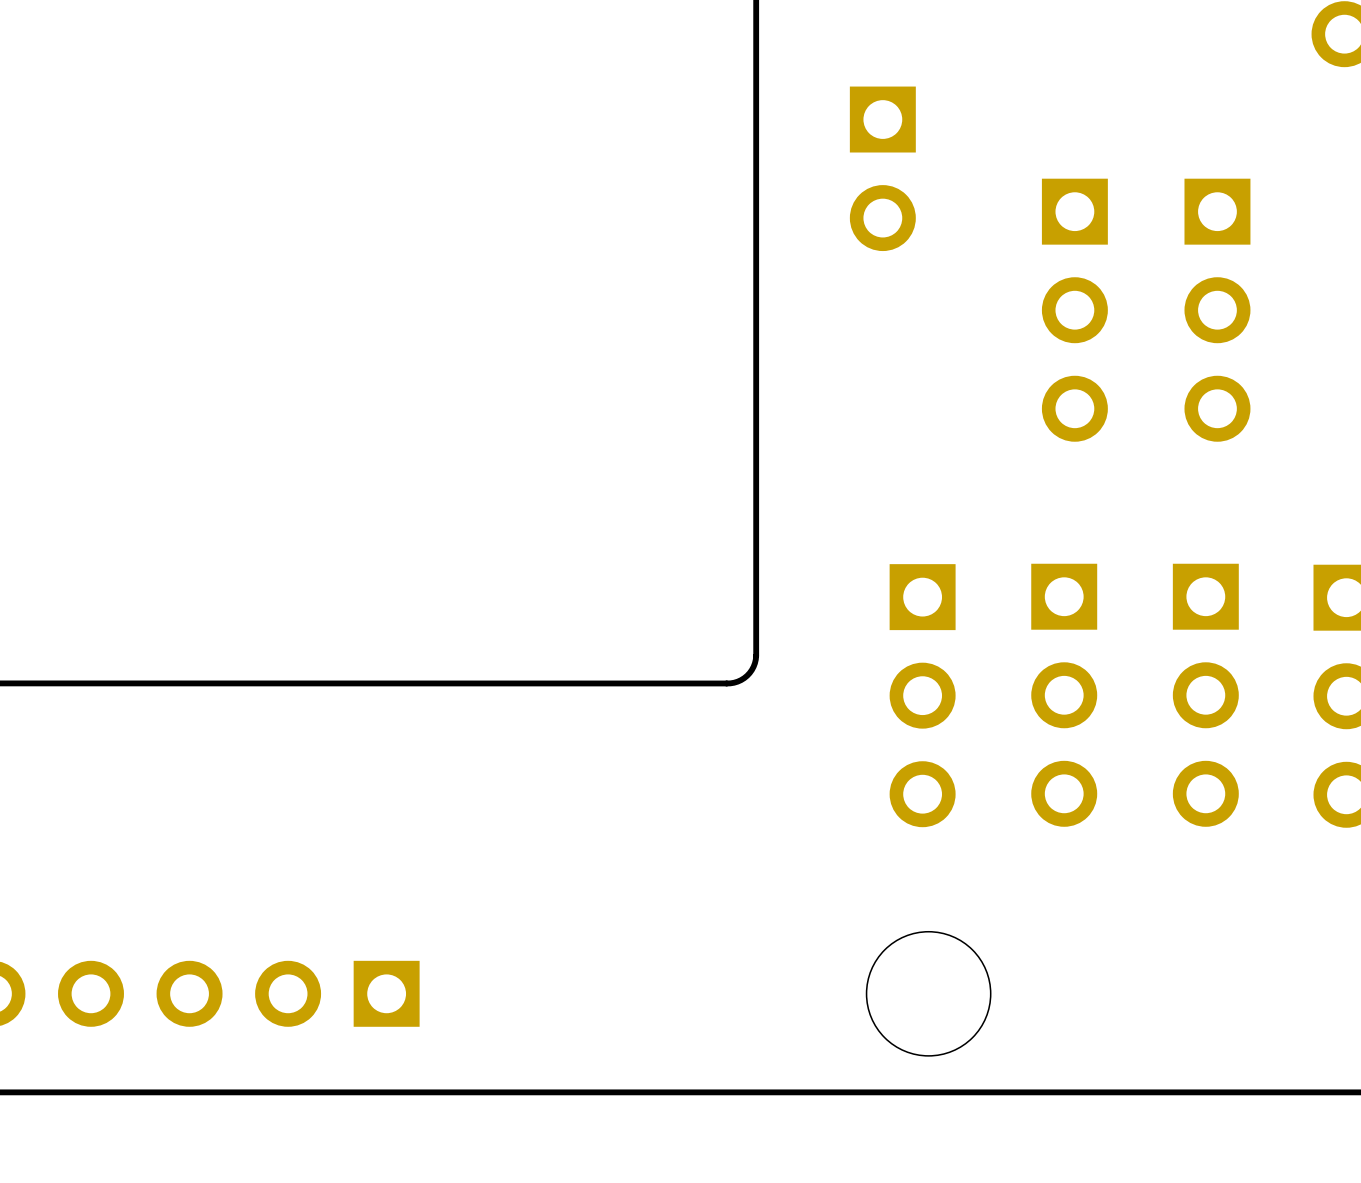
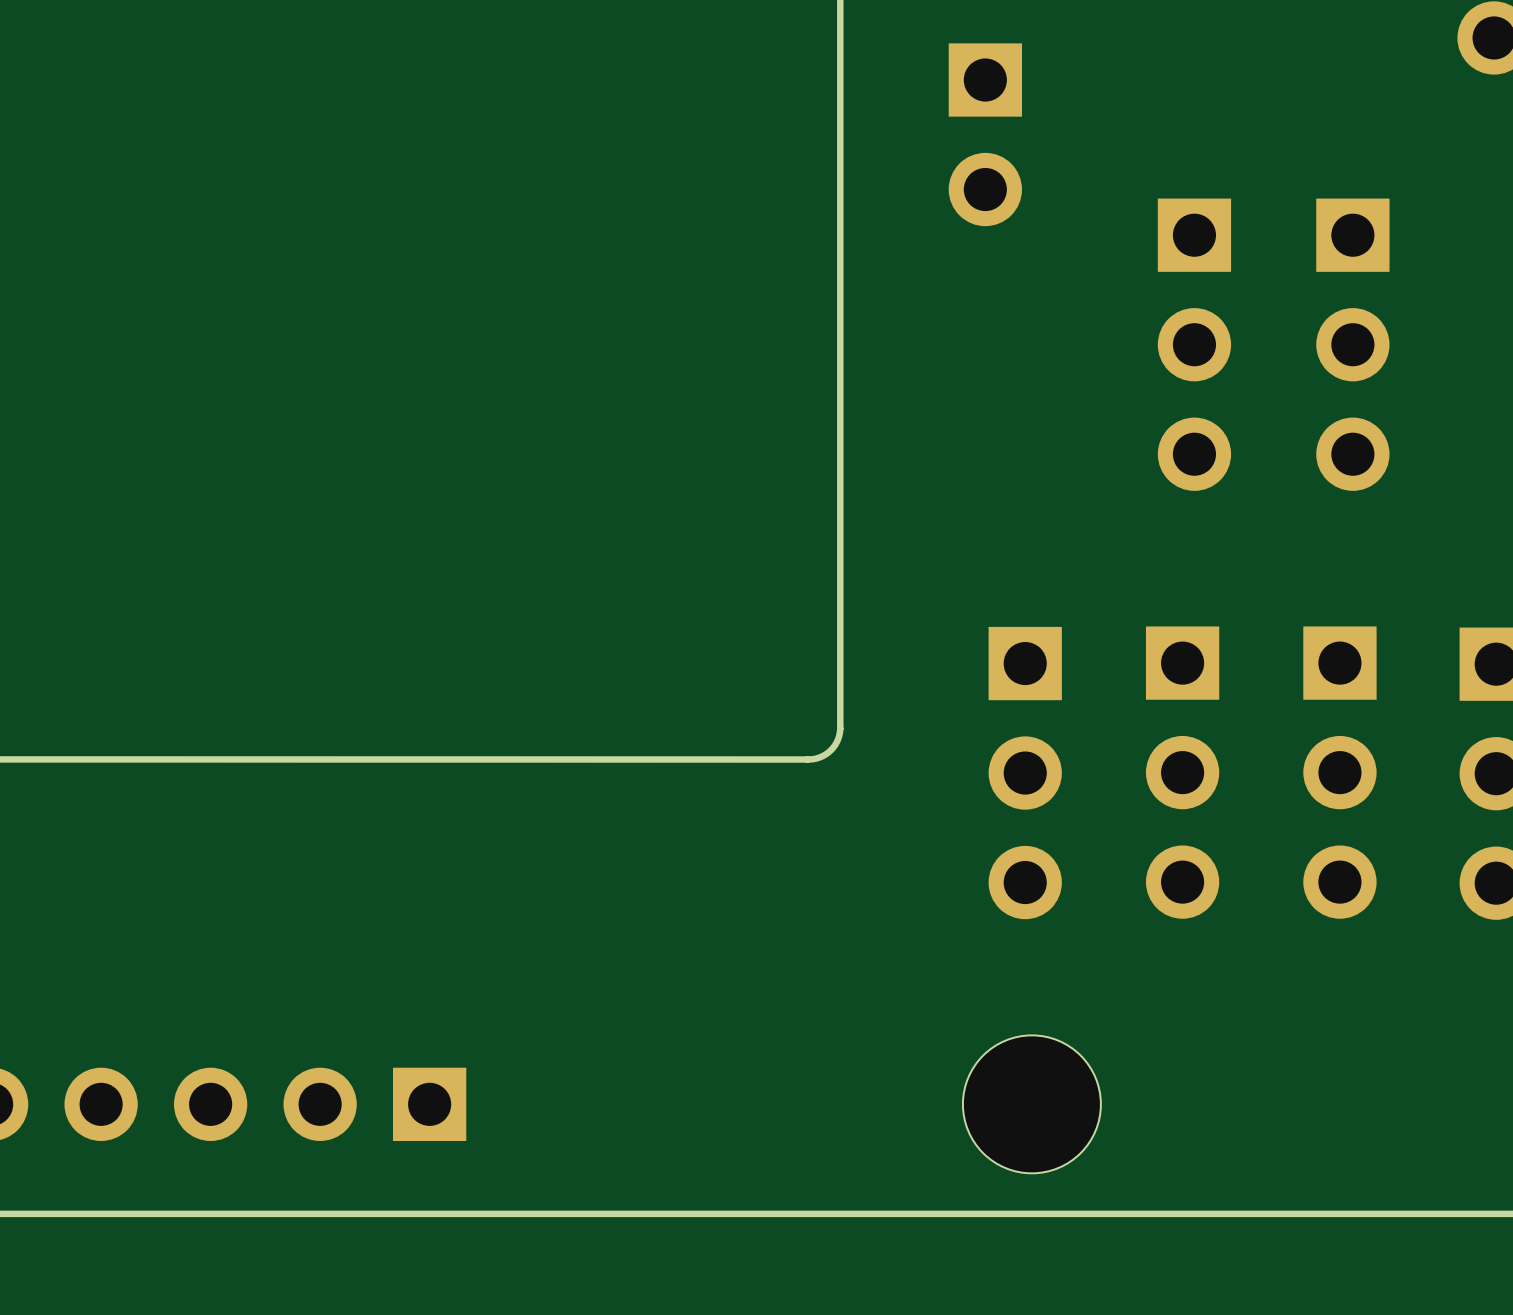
part position: (882, 168) -> (985, 134)

